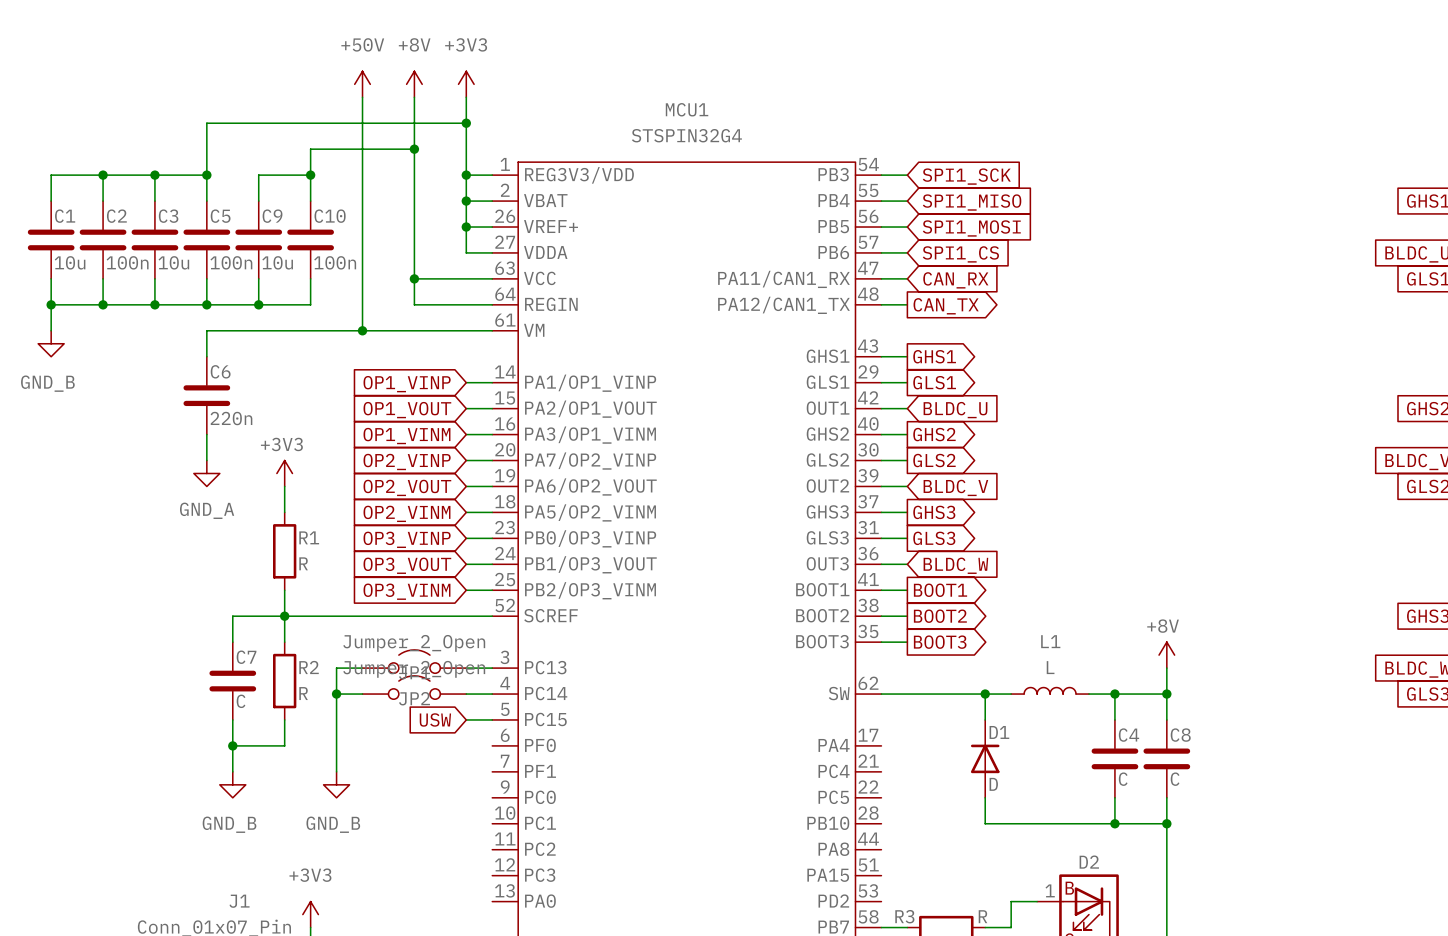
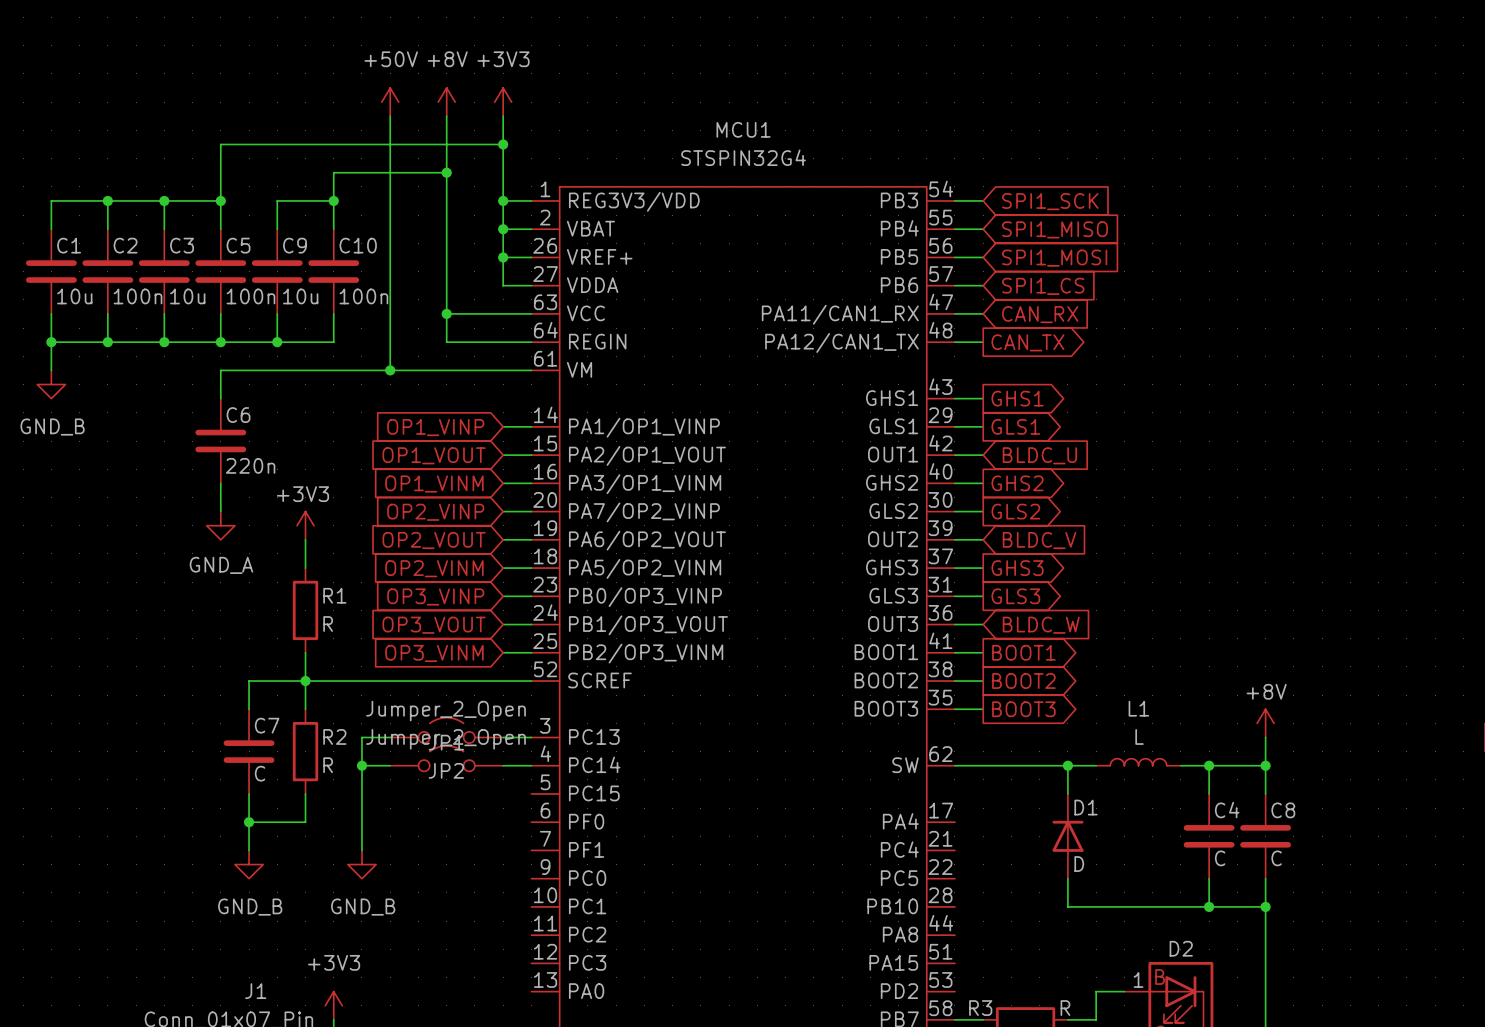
global label: USW (435, 719) -> none
wire: (466, 719) (492, 719) -> none

